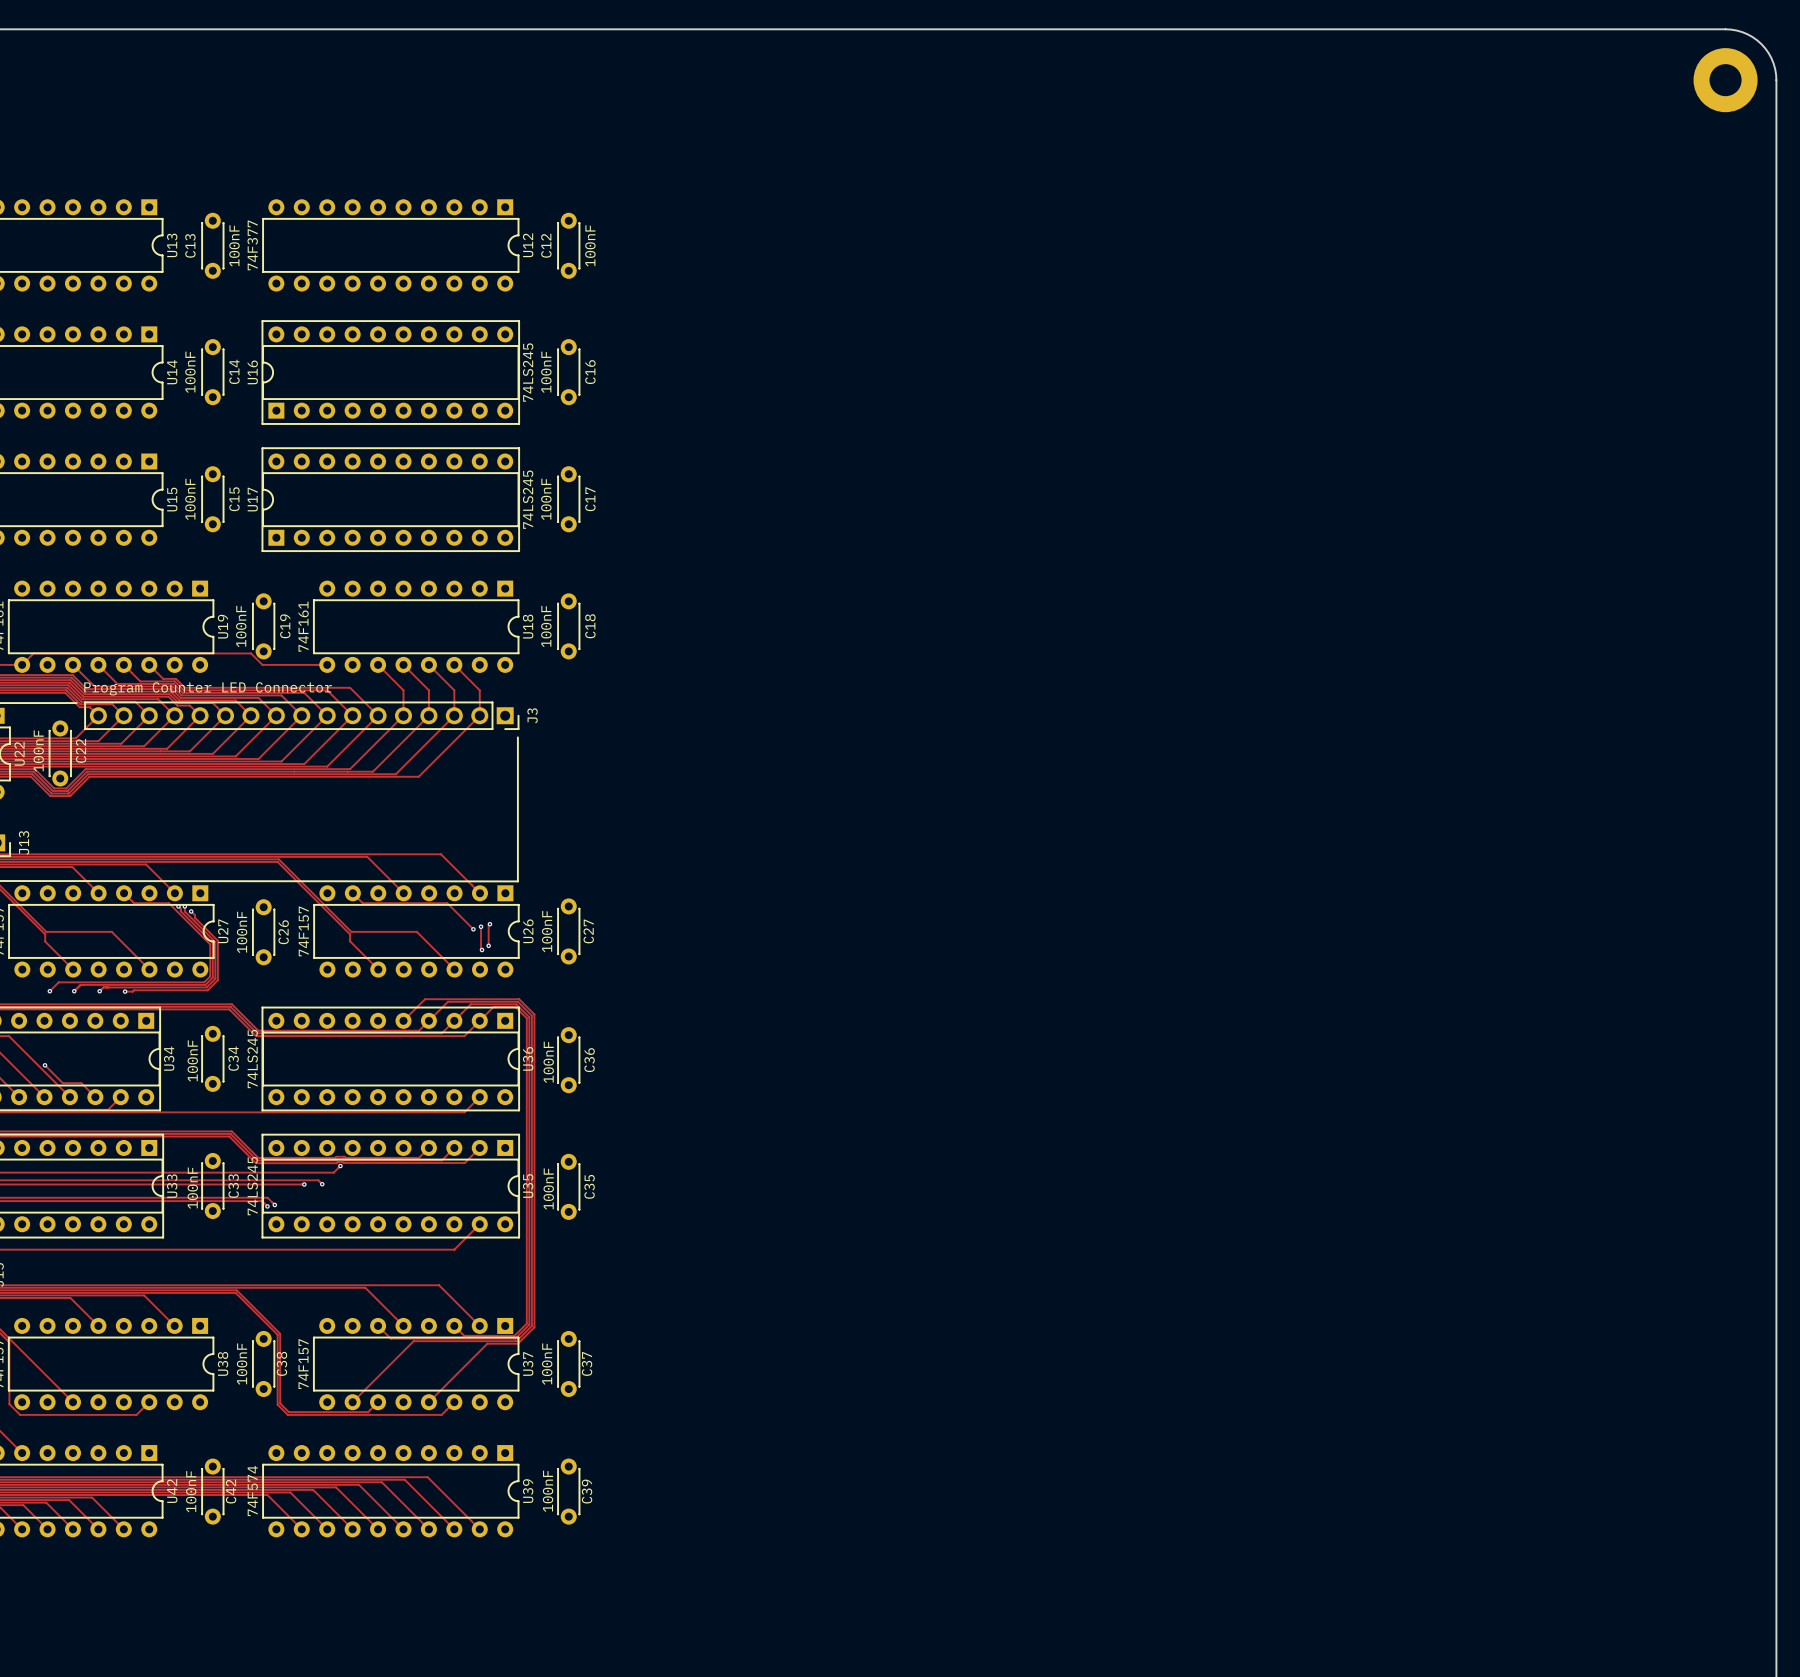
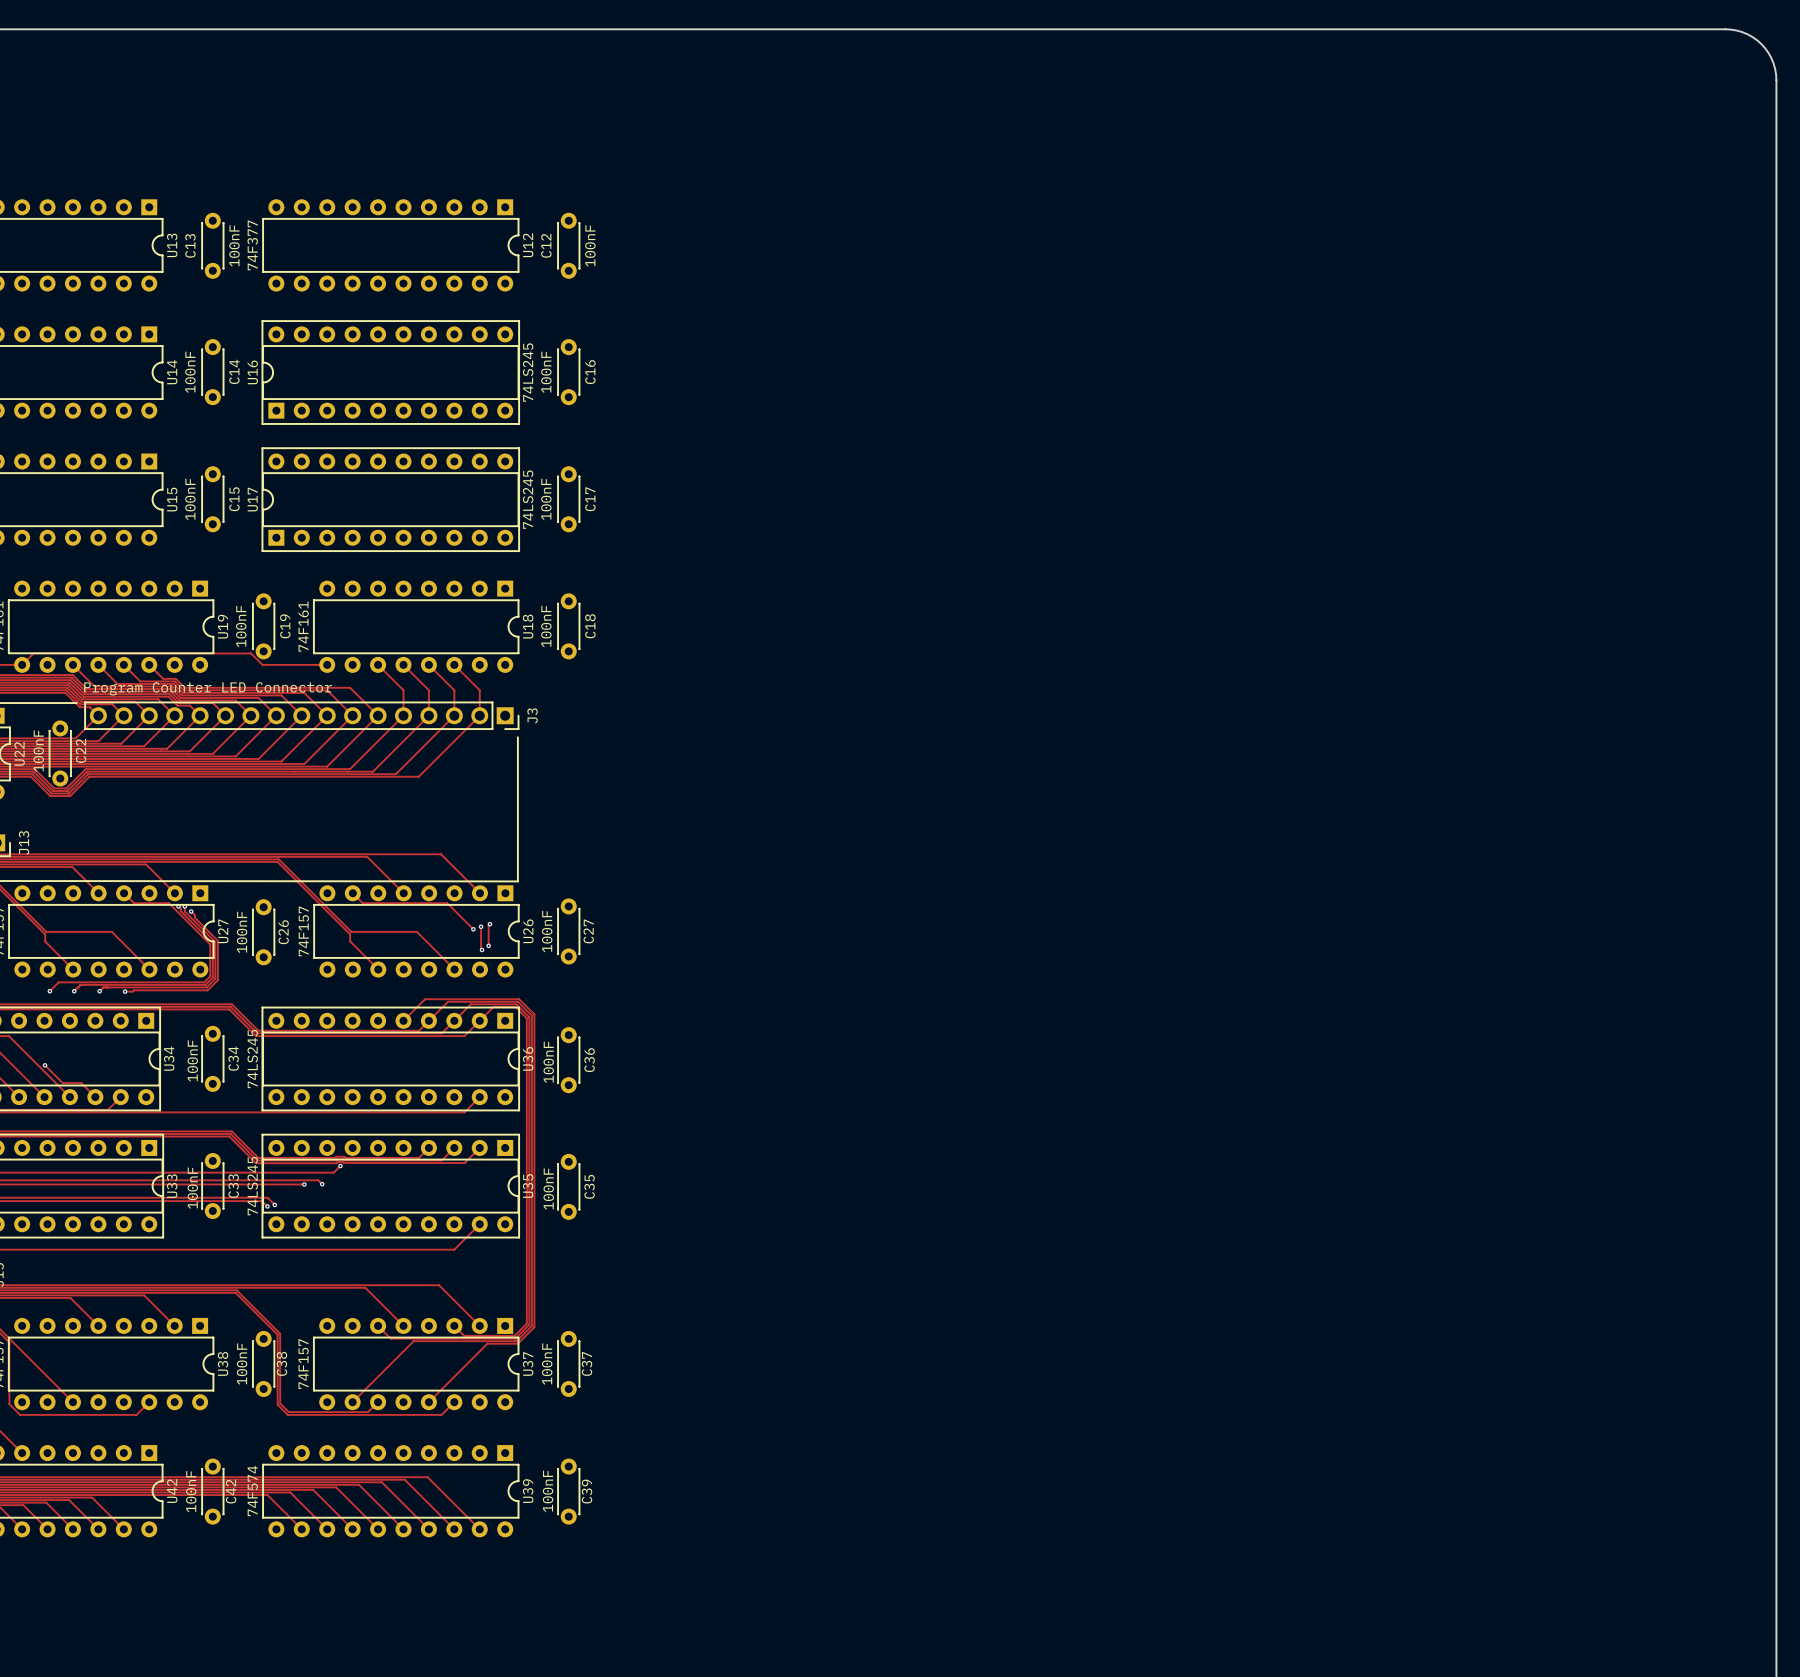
part: (1725, 80) -> none

